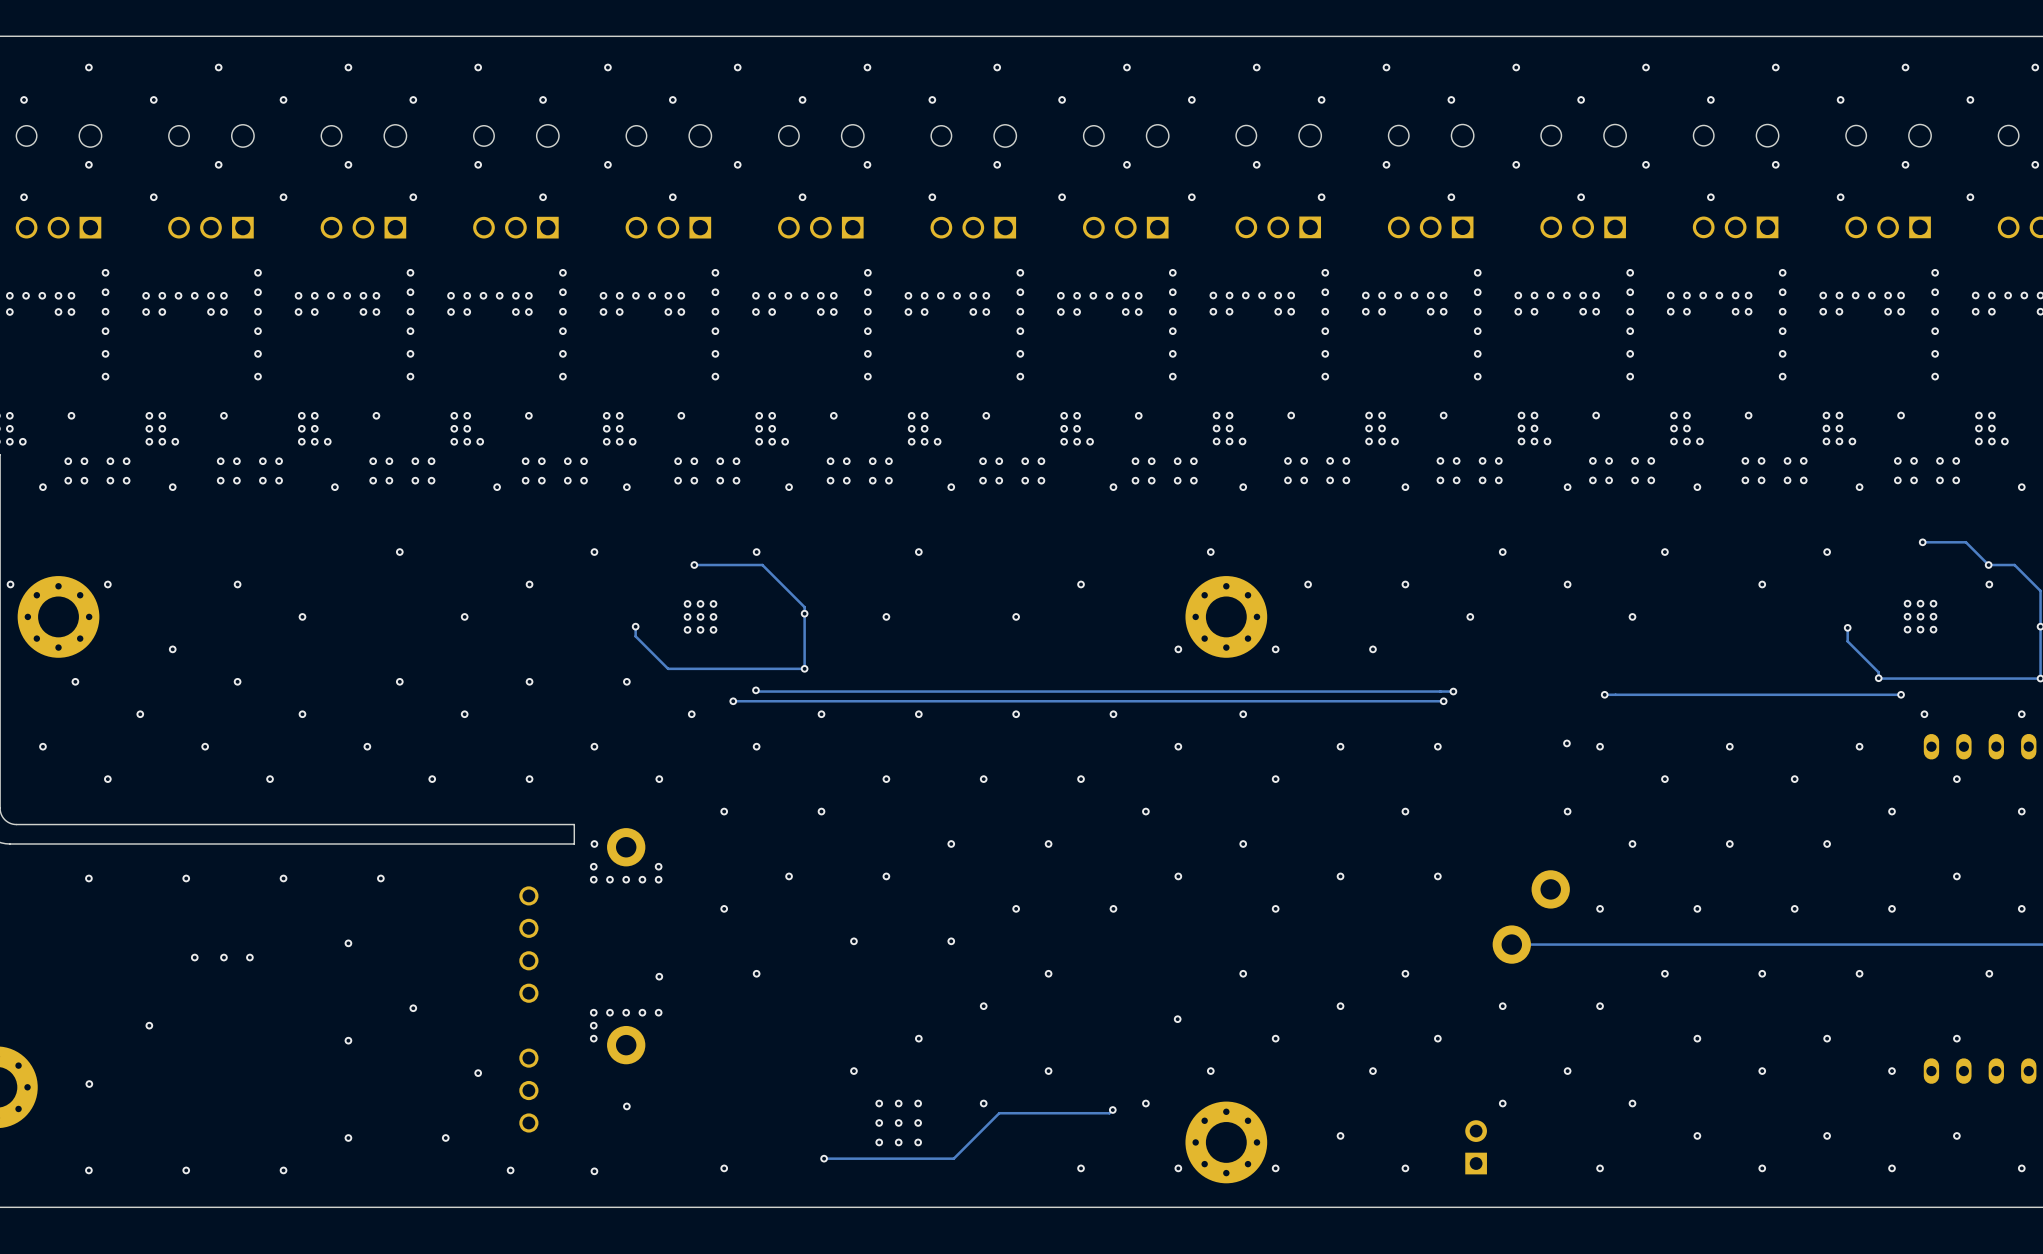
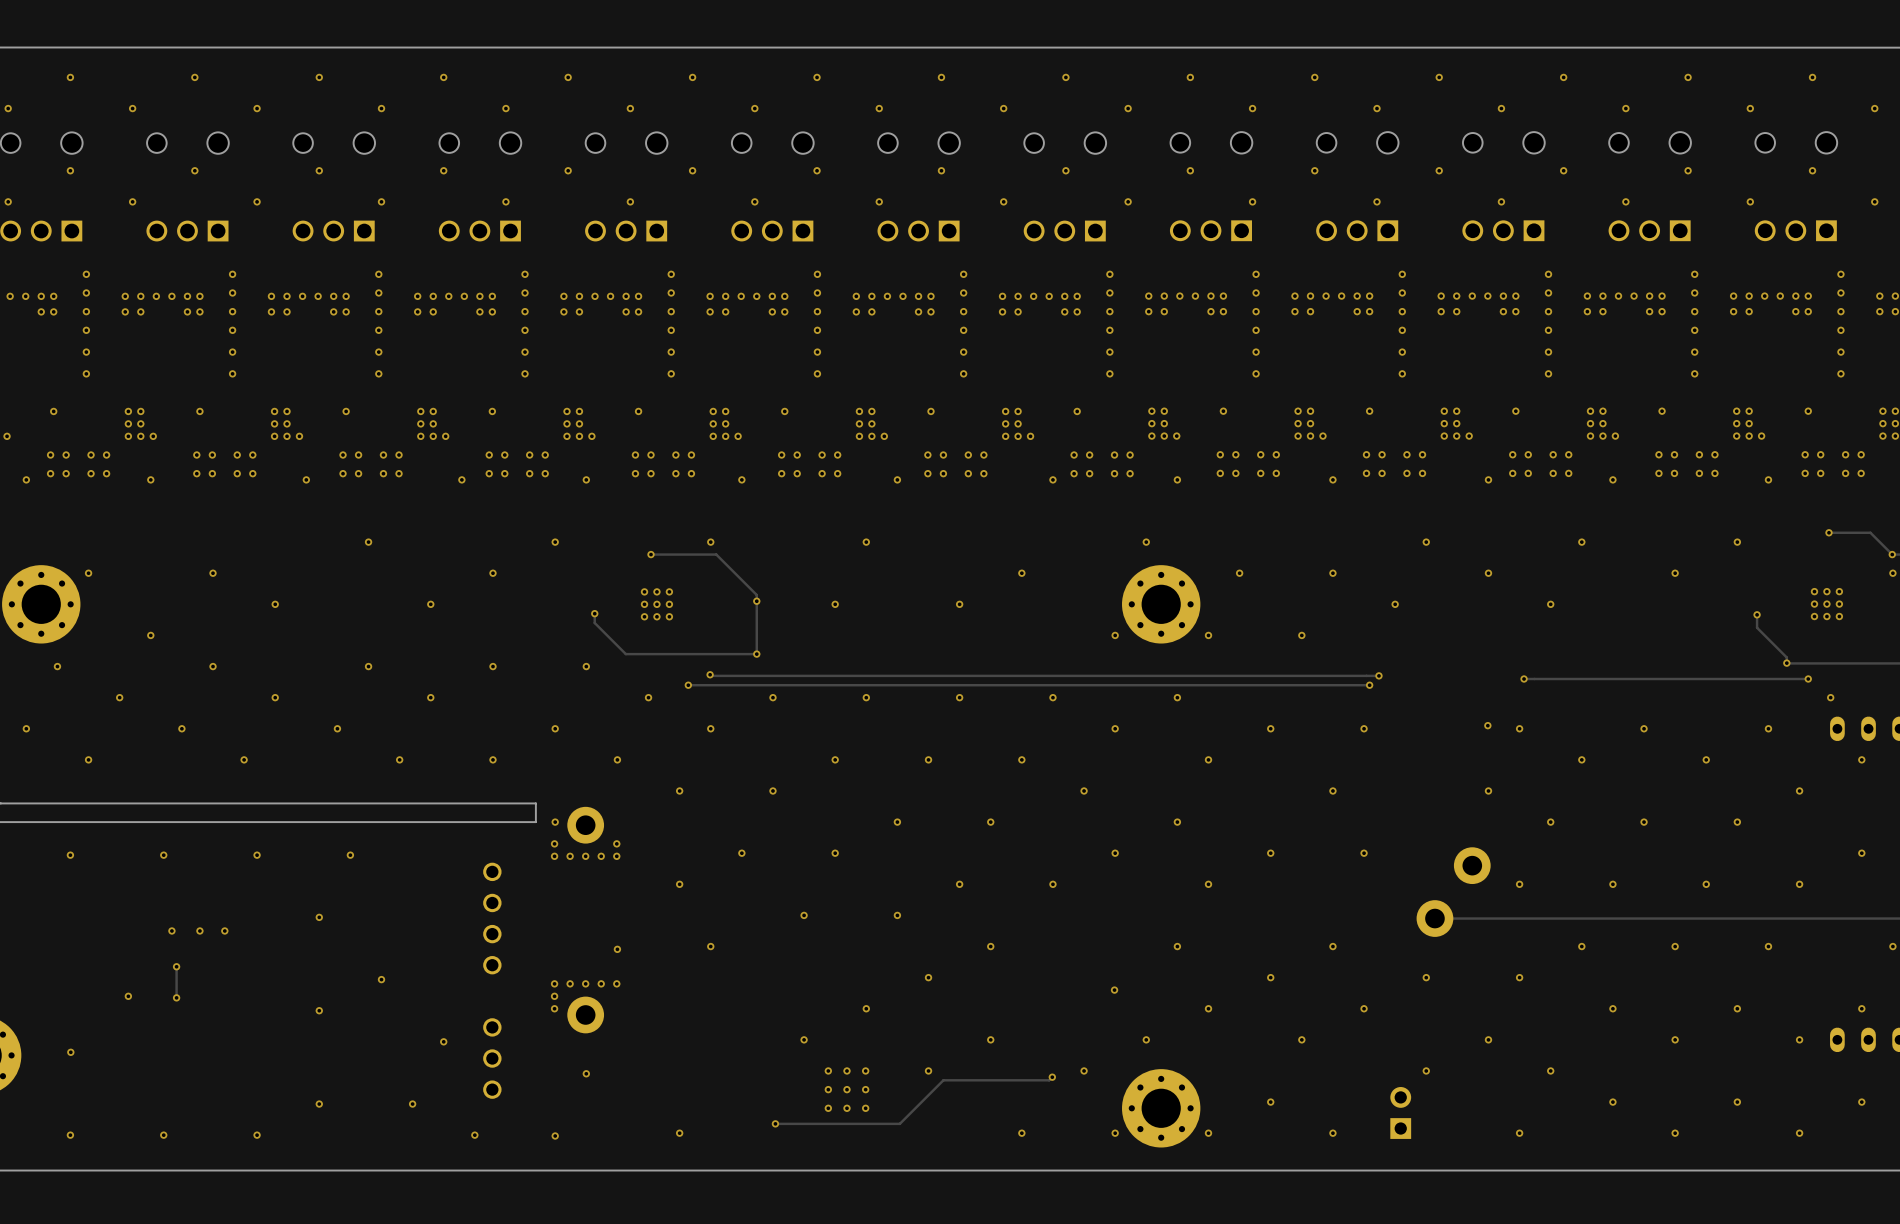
track: none -> (176, 966) (176, 997)
via: none -> (176, 966)
via: none -> (176, 997)

